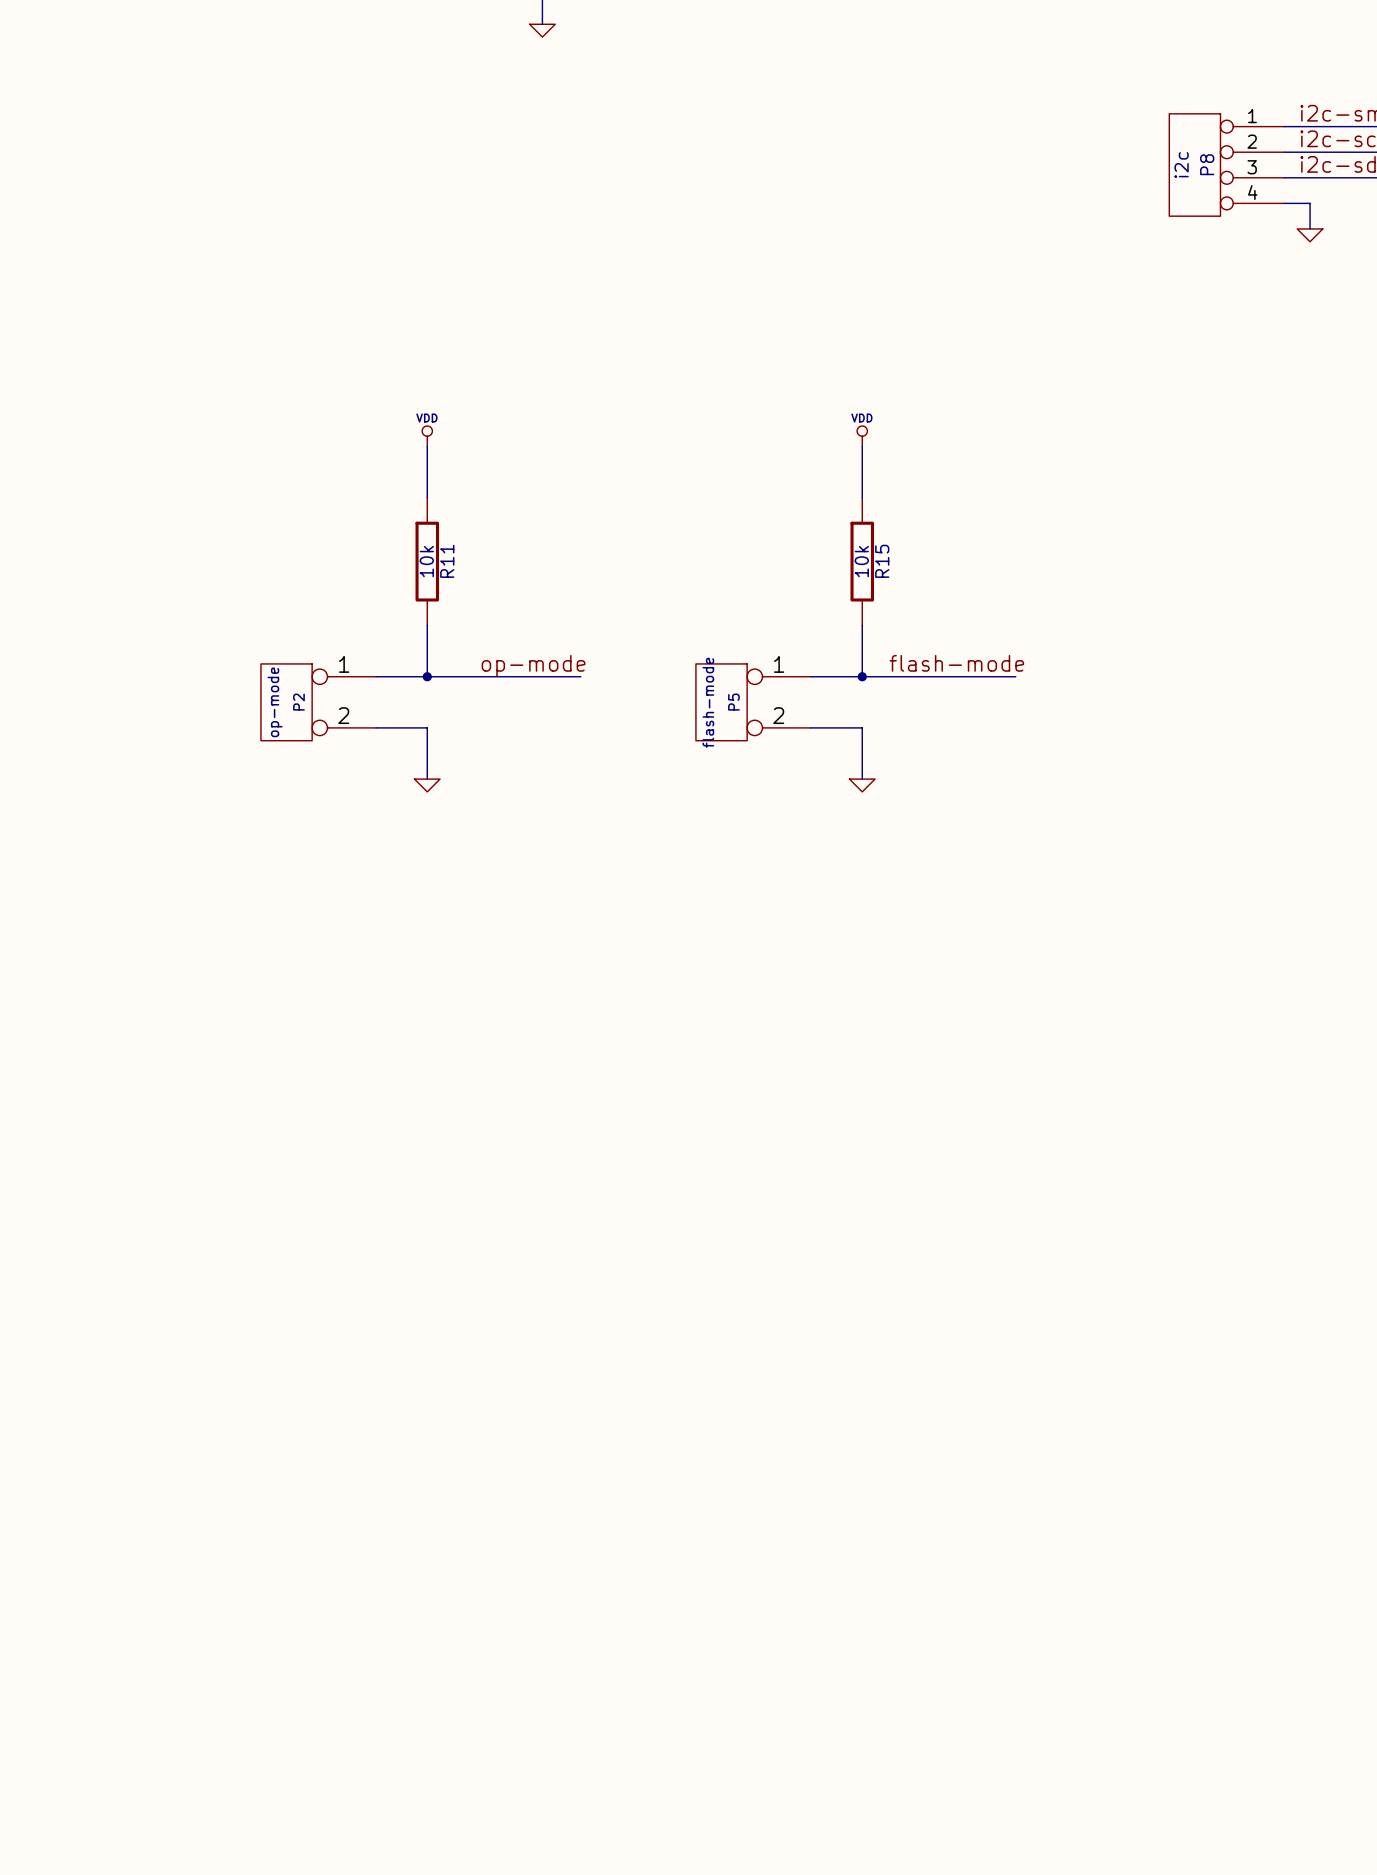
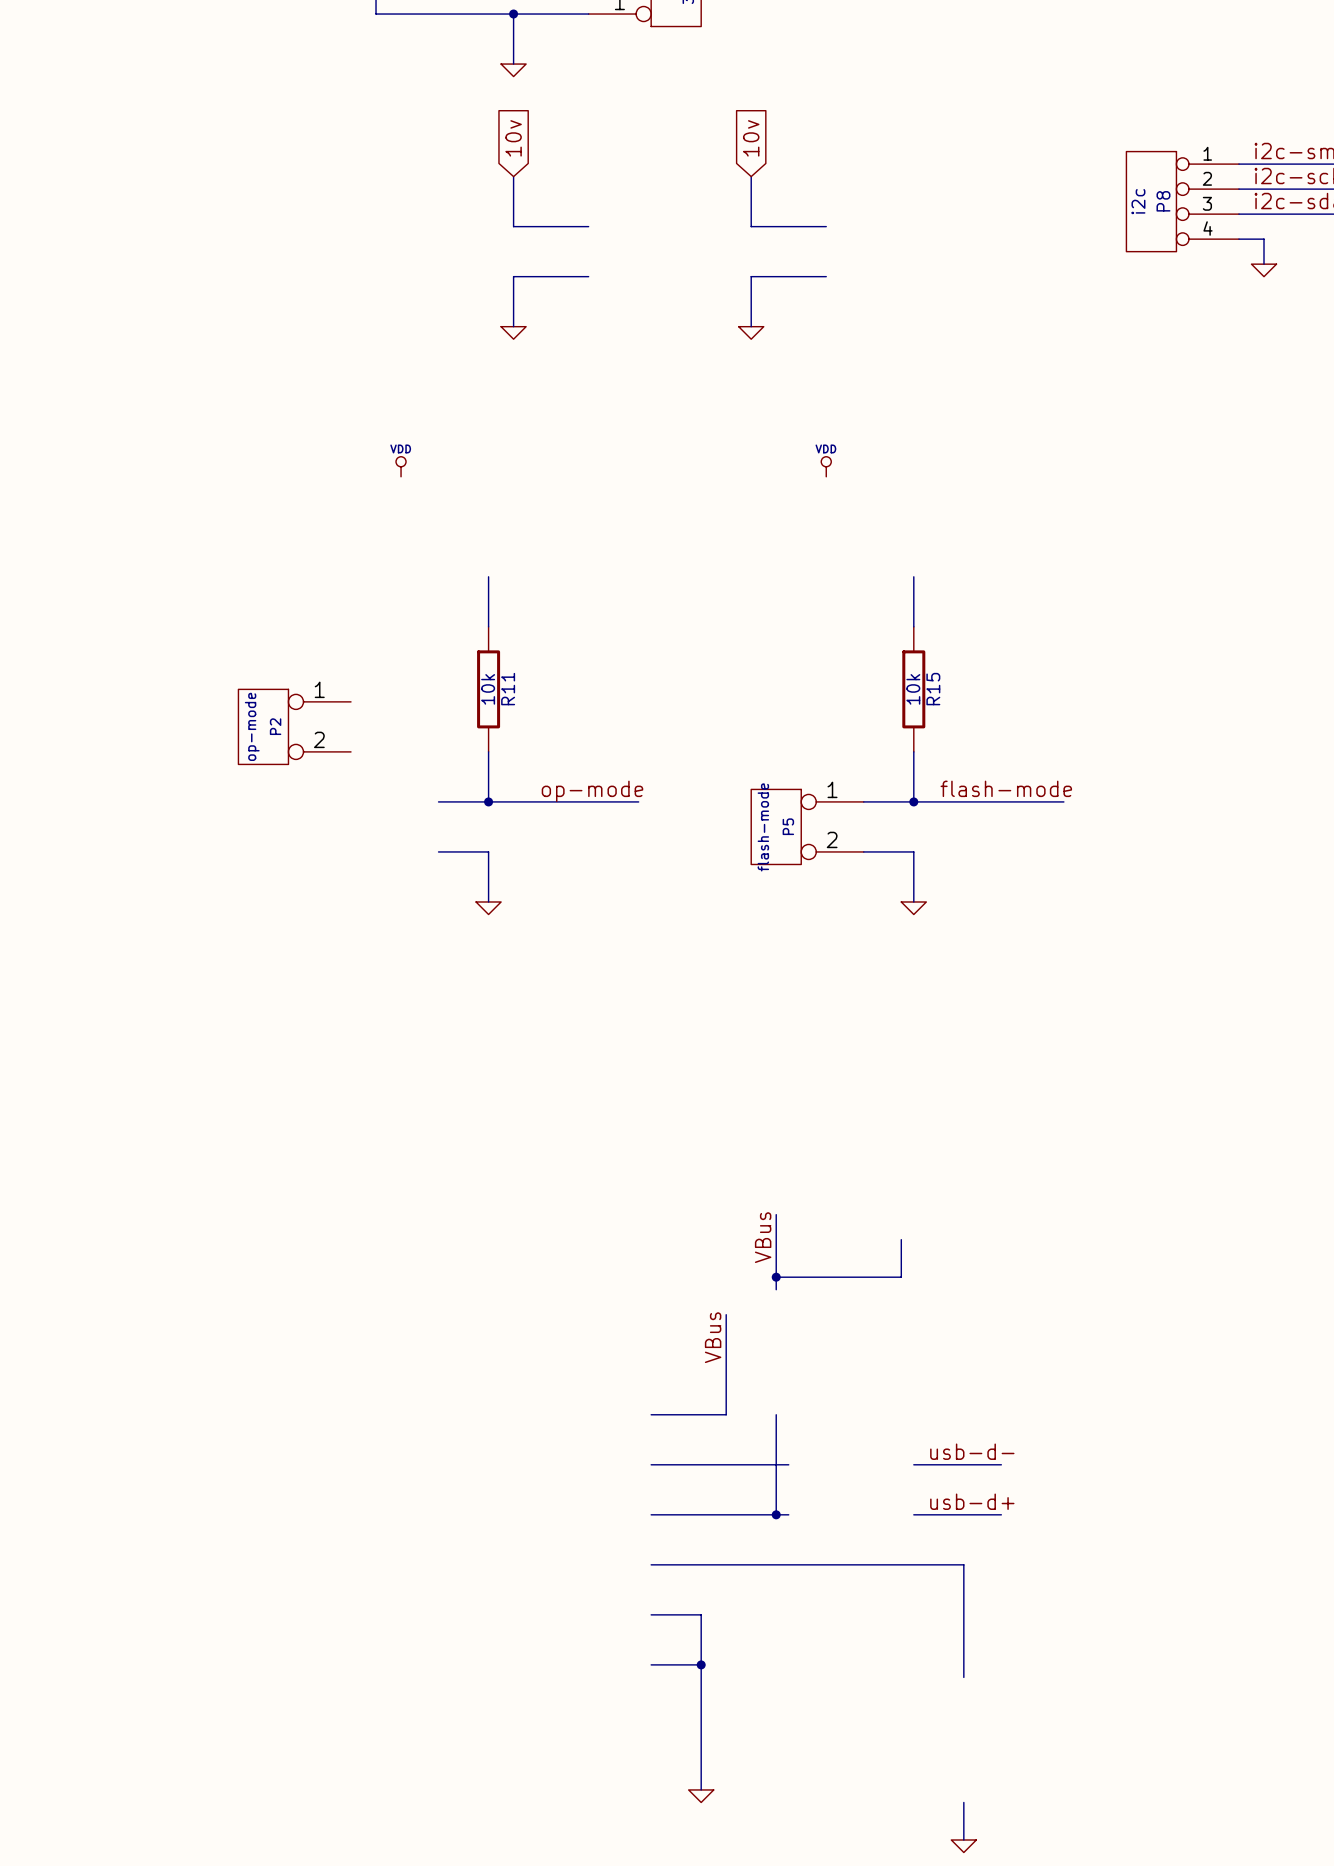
global label: none -> 10v (513, 138)
global label: none -> 10v (751, 138)
wire: none -> (513, 176) (513, 226) (588, 226)
wire: none -> (751, 176) (751, 226) (826, 226)
wire: none -> (588, 276) (513, 276) (513, 326)
wire: none -> (826, 276) (751, 276) (751, 326)
power symbol: none -> (513, 332)
power symbol: none -> (751, 332)
wire: (427, 446) (427, 497) -> (488, 576) (488, 626)
wire: (862, 446) (862, 497) -> (913, 576) (913, 626)
R11 position: (427, 561) -> (488, 689)
R15 position: (862, 561) -> (913, 689)
wire: (427, 625) (427, 676) -> (488, 751) (488, 801)
wire: (862, 625) (862, 676) -> (913, 751) (913, 801)
label position: flash-mode (956, 663) -> flash-mode (1006, 788)
label position: op-mode (533, 665) -> op-mode (592, 791)
wire: (376, 676) (580, 676) -> (438, 801) (638, 801)
junction: (427, 676) -> none
wire: (811, 676) (1015, 676) -> (863, 801) (1063, 801)
junction: (862, 676) -> none
P5 position: (753, 702) -> (807, 826)
wire: (376, 727) (427, 727) (427, 779) -> (438, 851) (488, 851) (488, 901)
wire: (811, 727) (862, 727) (862, 779) -> (863, 851) (913, 851) (913, 901)
junction: none -> (488, 801)
junction: none -> (913, 801)
power symbol position: (427, 785) -> (488, 908)
power symbol position: (862, 785) -> (913, 908)
wire: none -> (776, 1214) (776, 1289)
label: none -> VBus (763, 1237)
wire: none -> (901, 1239) (901, 1277) (776, 1277)
junction: none -> (776, 1277)
wire: none -> (726, 1314) (726, 1414) (651, 1414)
label: none -> VBus (713, 1337)
wire: none -> (776, 1414) (776, 1514)
label: none -> usb-d- (972, 1451)
wire: none -> (651, 1464) (788, 1464)
wire: none -> (913, 1464) (1001, 1464)
label: none -> usb-d+ (972, 1501)
wire: none -> (651, 1514) (788, 1514)
junction: none -> (776, 1514)
wire: none -> (913, 1514) (1001, 1514)
wire: none -> (651, 1564) (963, 1564) (963, 1677)
wire: none -> (651, 1614) (701, 1614) (701, 1789)
wire: none -> (651, 1664) (701, 1664)
junction: none -> (701, 1664)
power symbol: none -> (701, 1796)
wire: none -> (963, 1802) (963, 1840)
power symbol: none -> (963, 1846)

